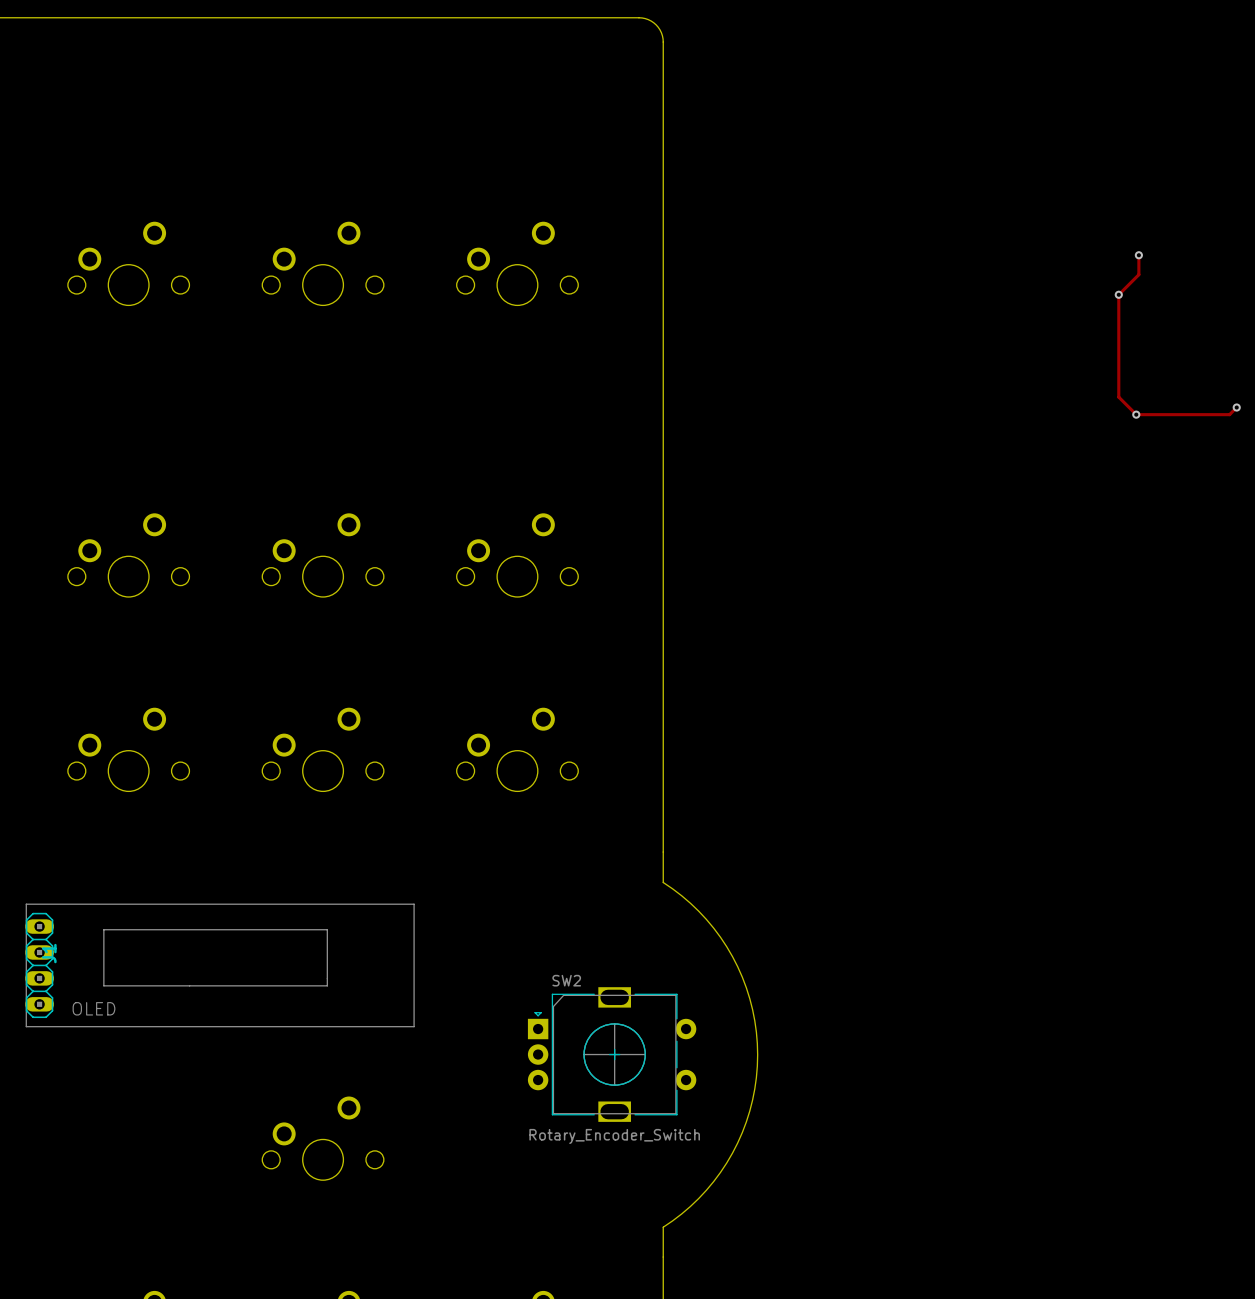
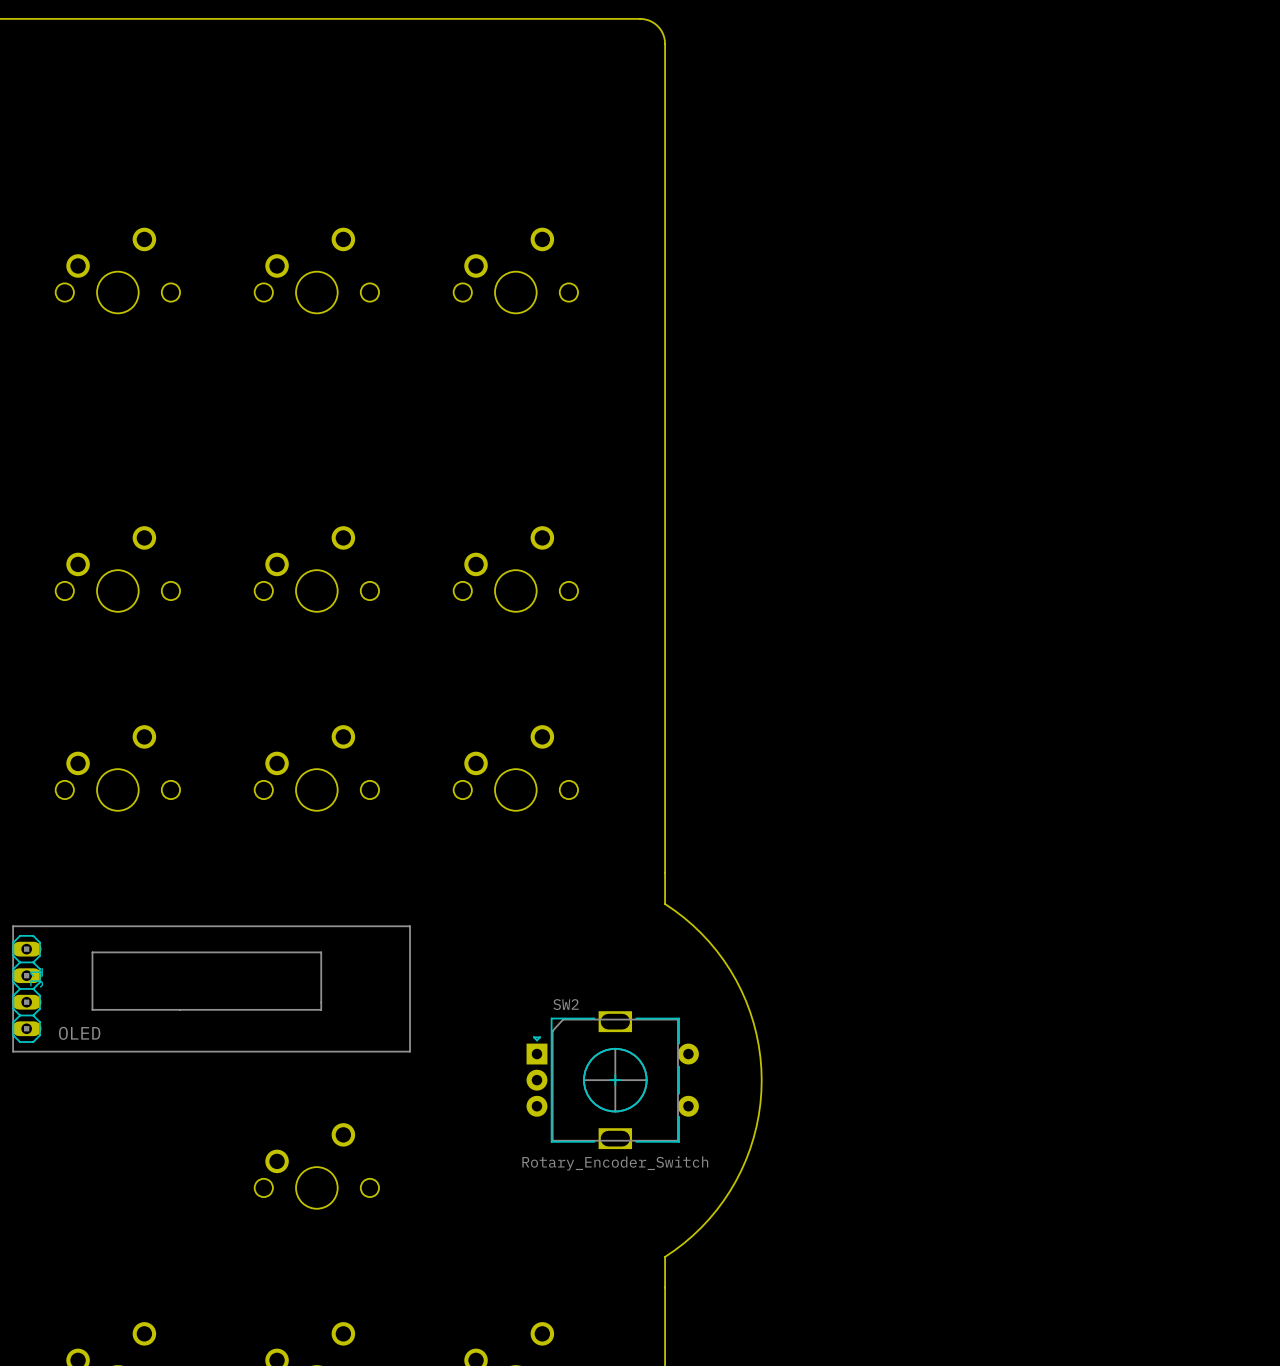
track: (1138, 255) (1138, 274) (1118, 294) (1118, 397) (1136, 414) (1229, 414) (1236, 407) -> none
via: (1138, 255) -> none
via: (1118, 294) -> none
via: (1236, 407) -> none
via: (1136, 414) -> none

